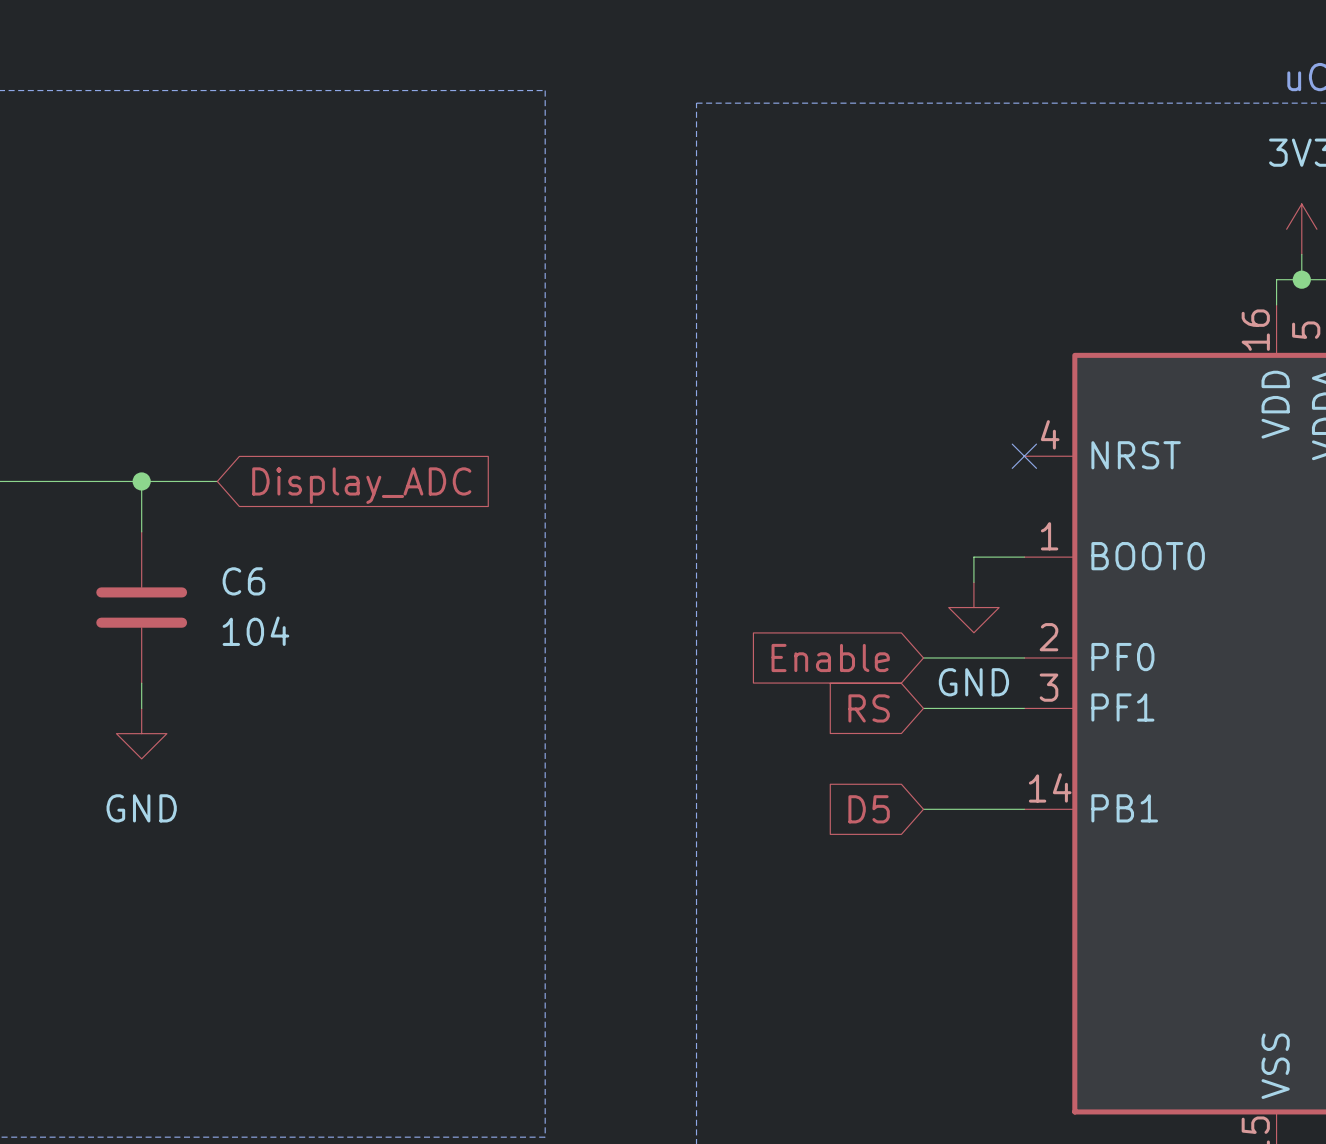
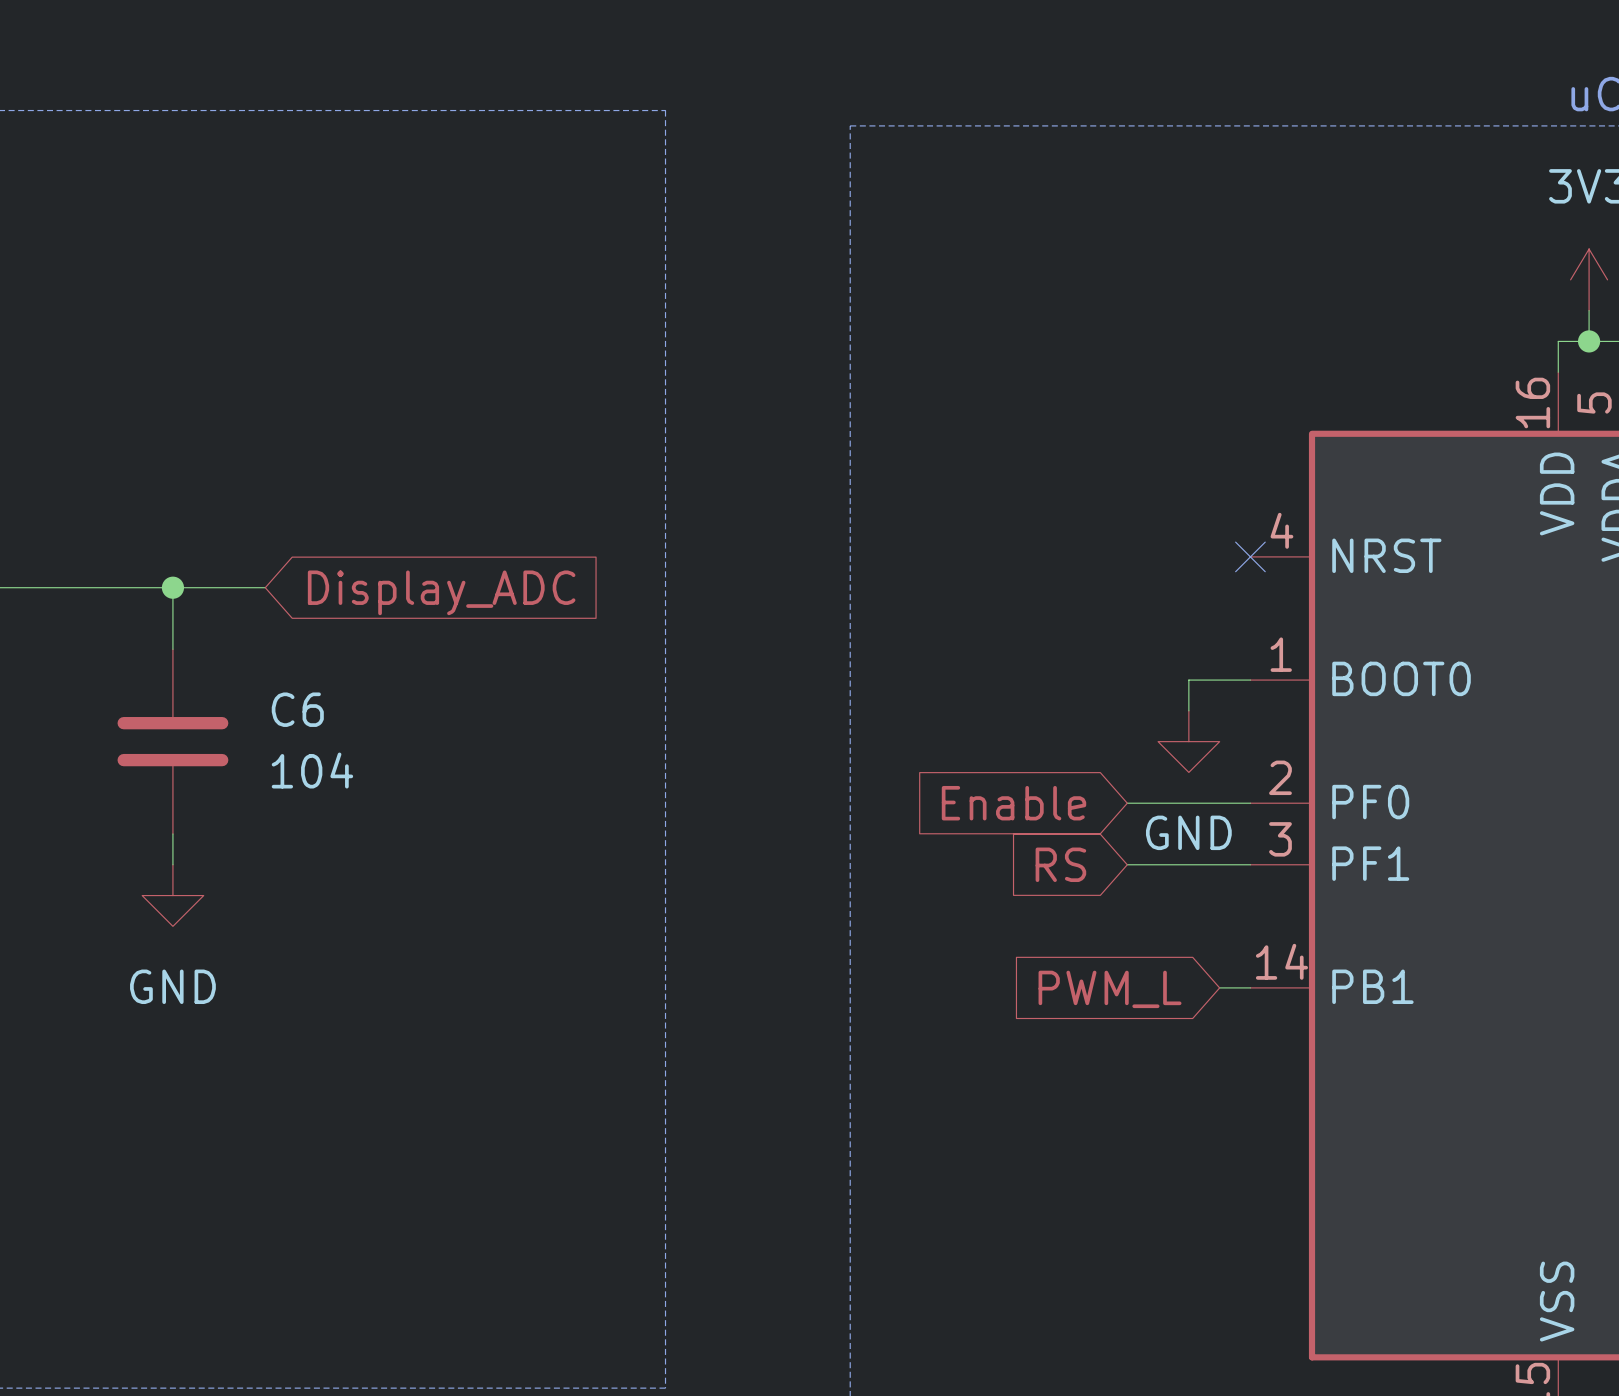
global label: D5 (869, 809) -> none
wire: (923, 809) (999, 809) -> none
global label: none -> PWM_L (1110, 989)

